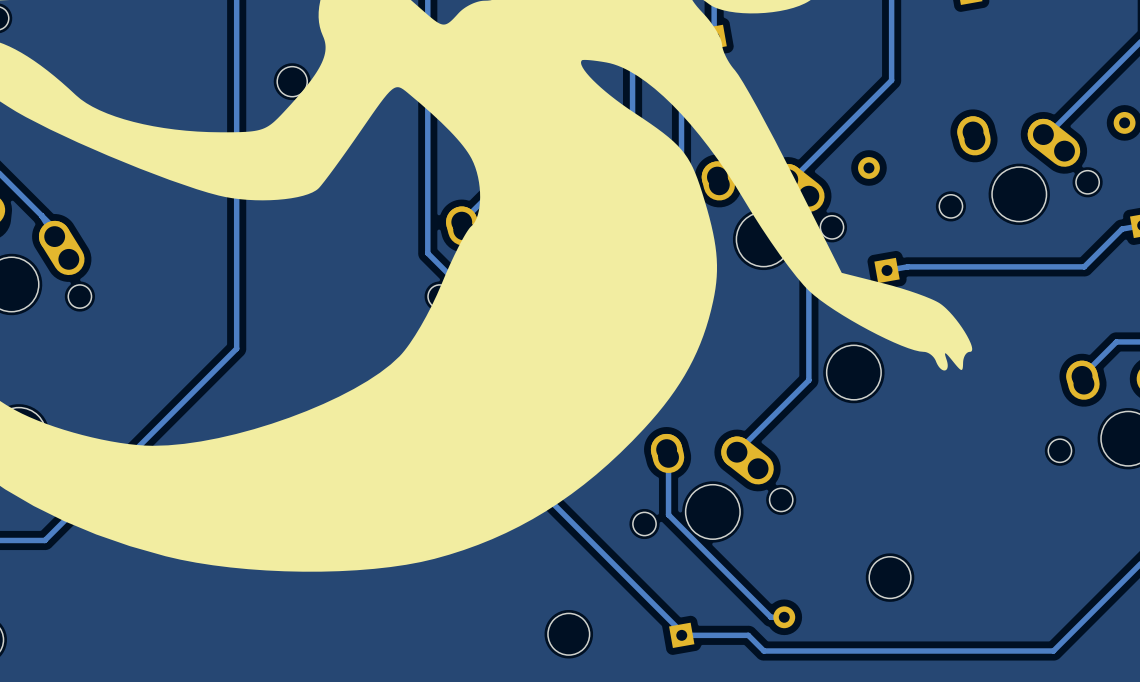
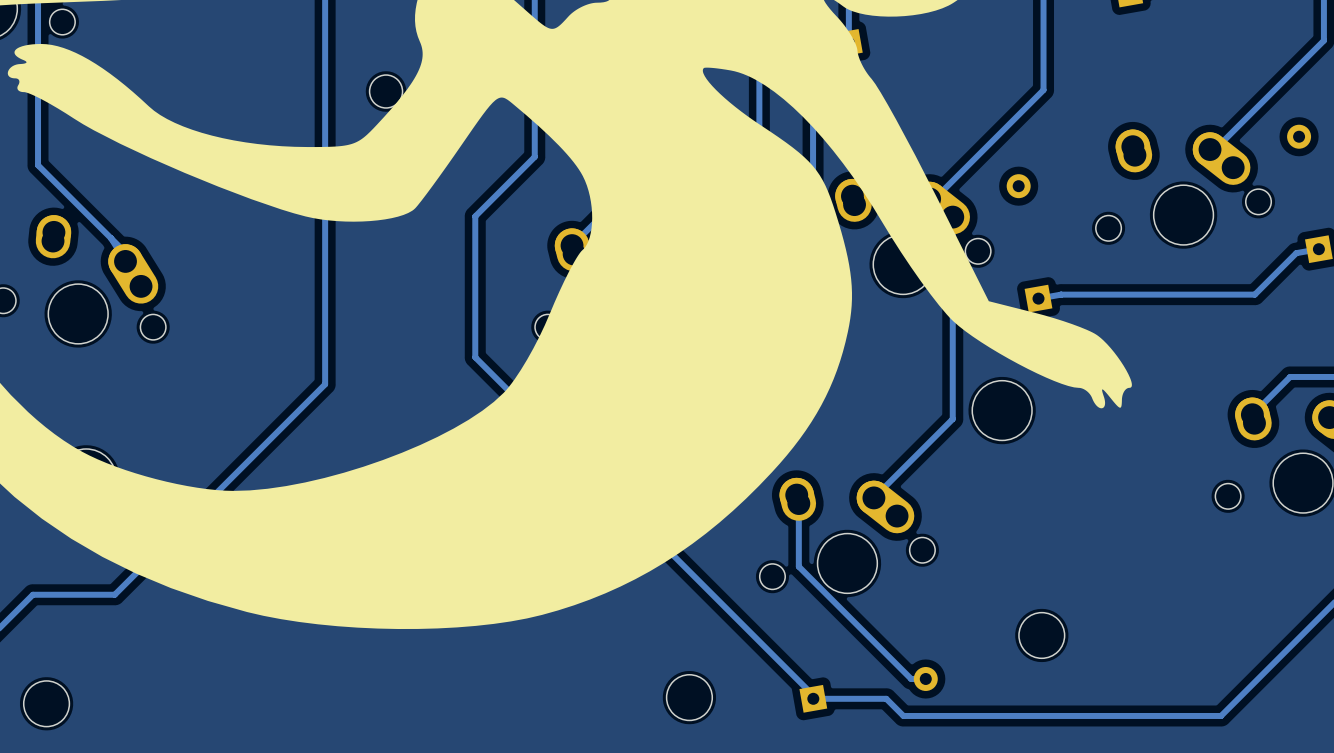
track: (427, 141) (427, 253) (468, 294) (468, 419) -> (534, 156) (475, 216) (475, 357) (579, 461)

